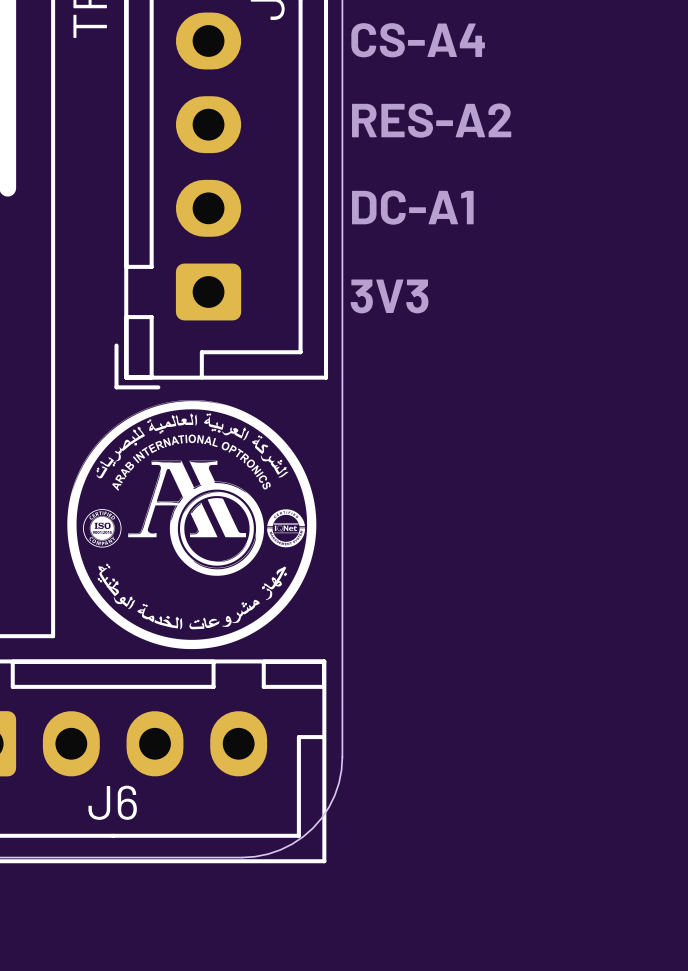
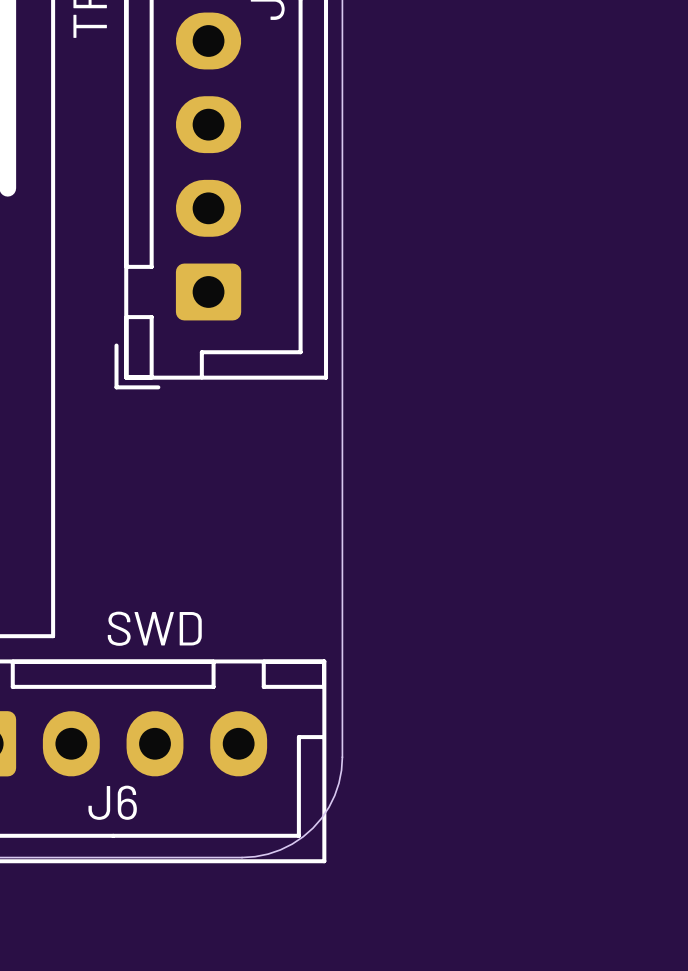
text: CS-A4 (418, 40) -> none
text: RES-A2 (431, 120) -> none
text: DC-A1 (412, 207) -> none
text: 3V3 (389, 296) -> none
drawing: [67, 400, 317, 650] -> none
J6 text: none -> SWD (154, 628)

